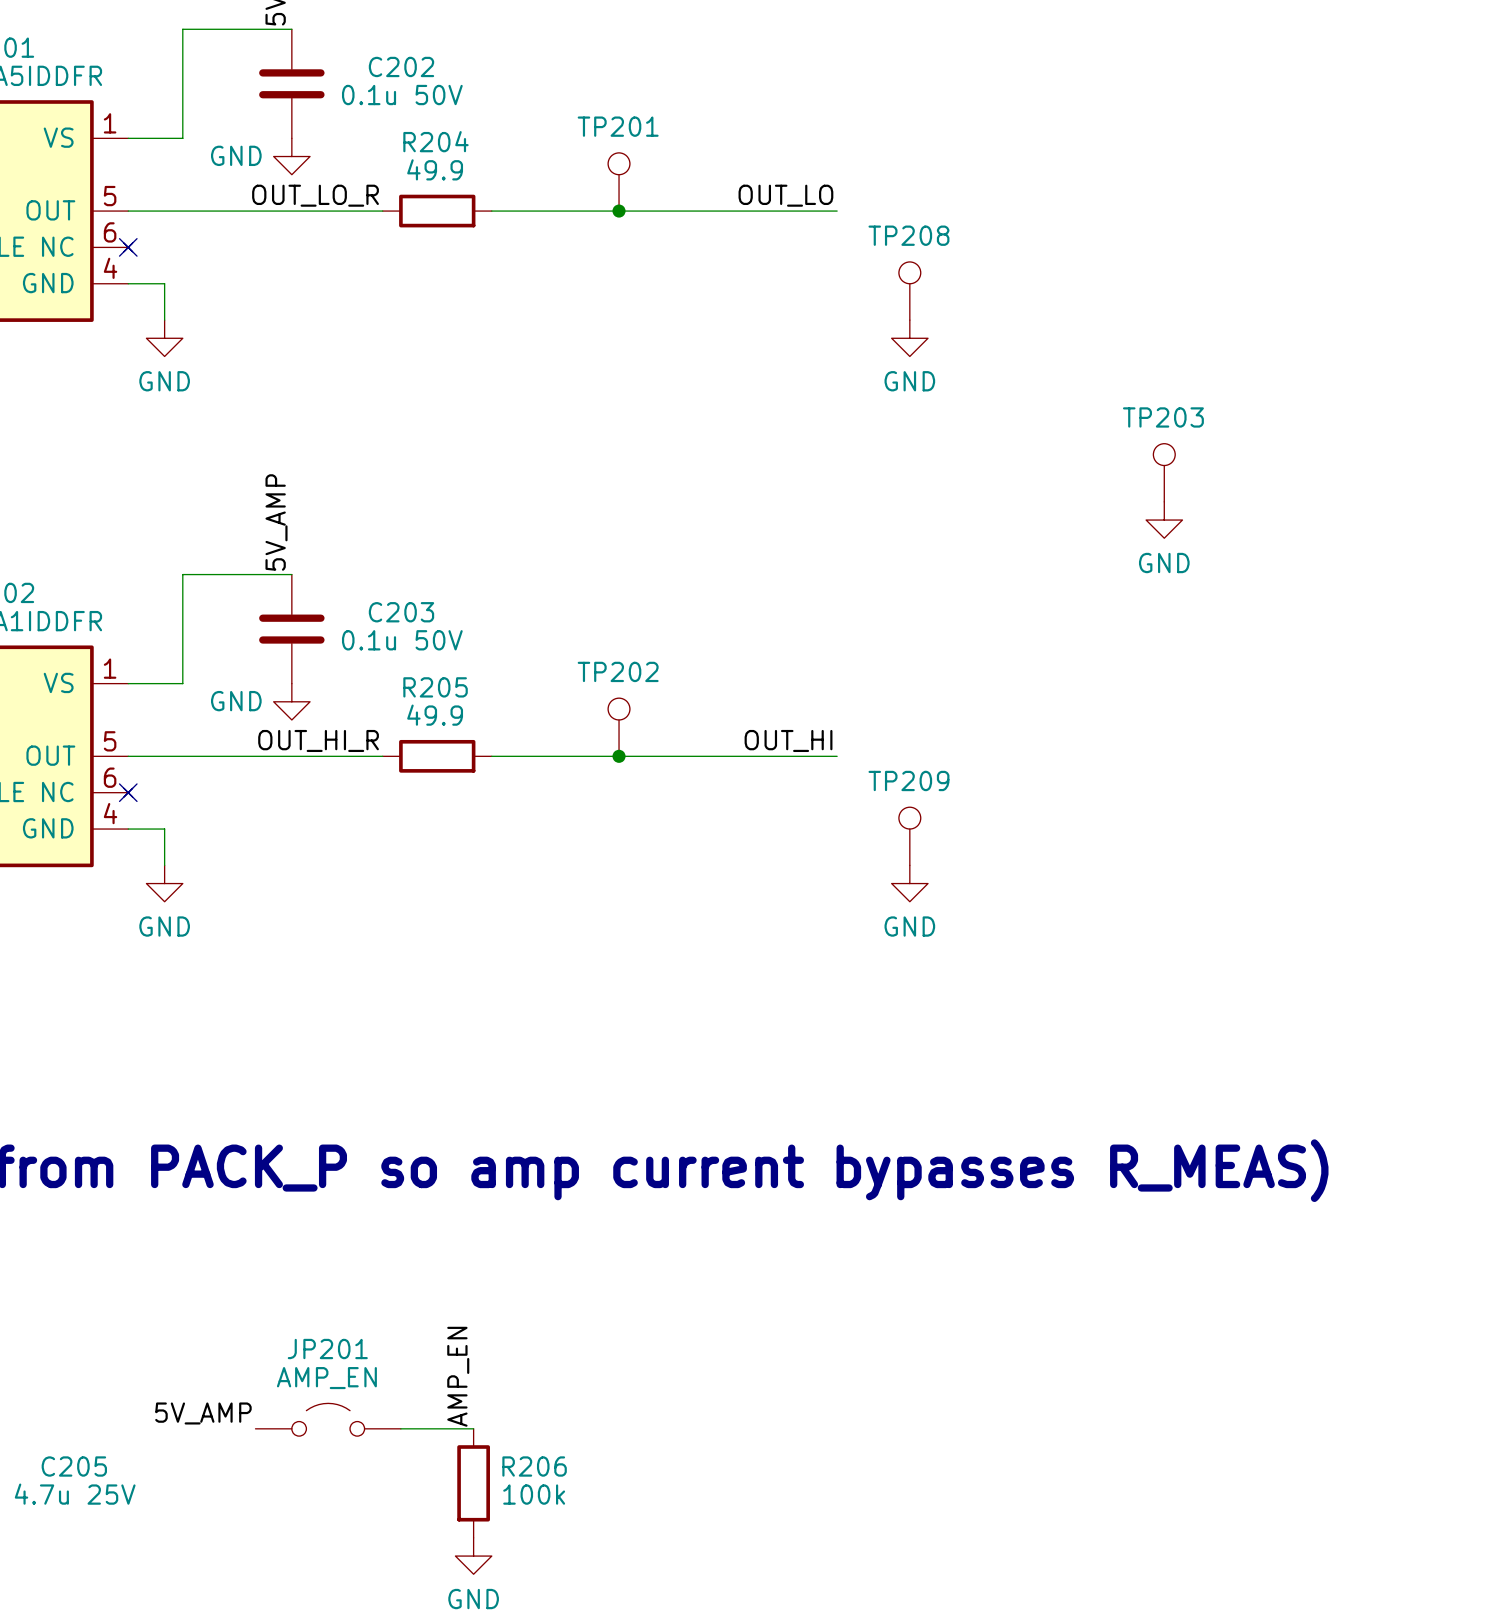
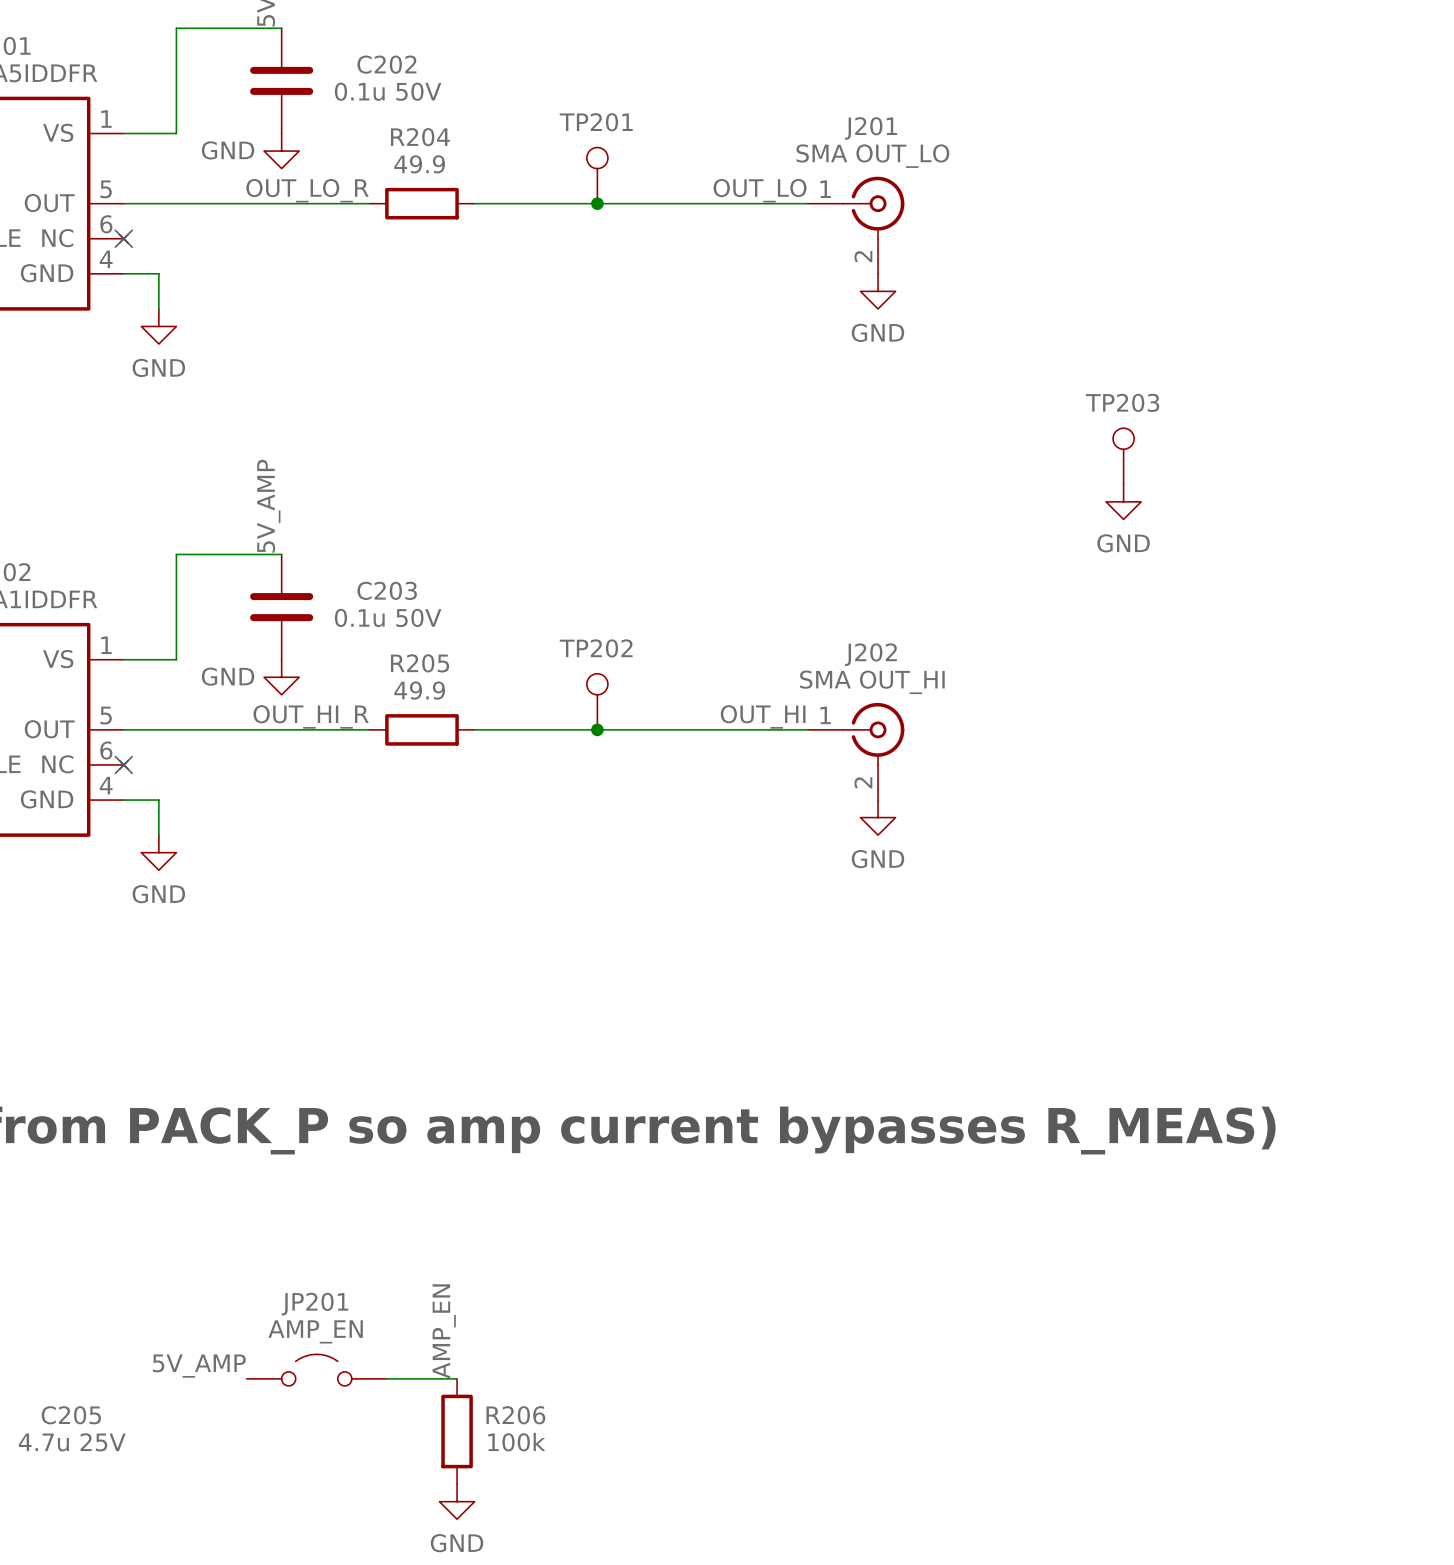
J201: none -> SMA OUT_LO (856, 225)
TP208: (909, 291) -> none
power symbol position: GND (909, 338) -> GND (878, 291)
J202: none -> SMA OUT_HI (856, 751)
TP209: (909, 836) -> none
power symbol position: GND (909, 883) -> GND (878, 817)

